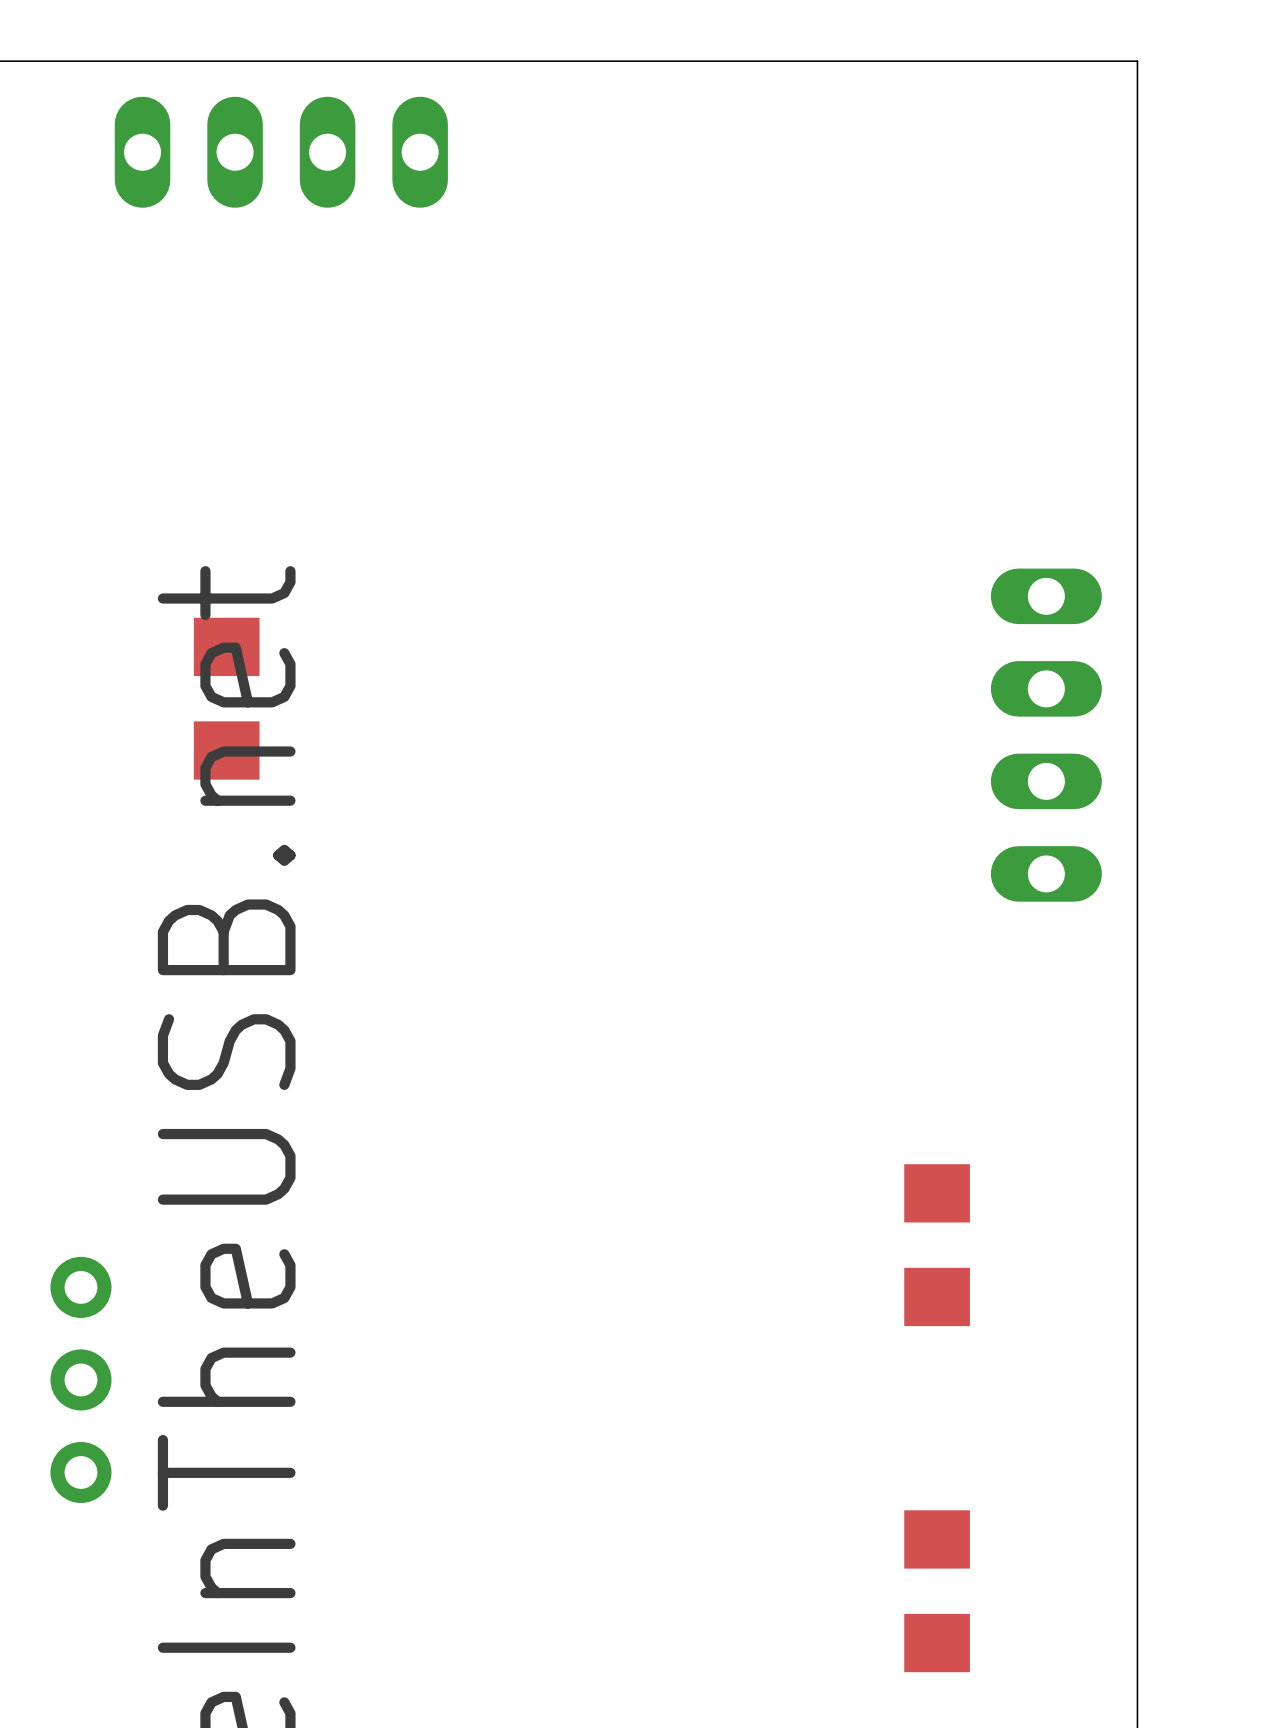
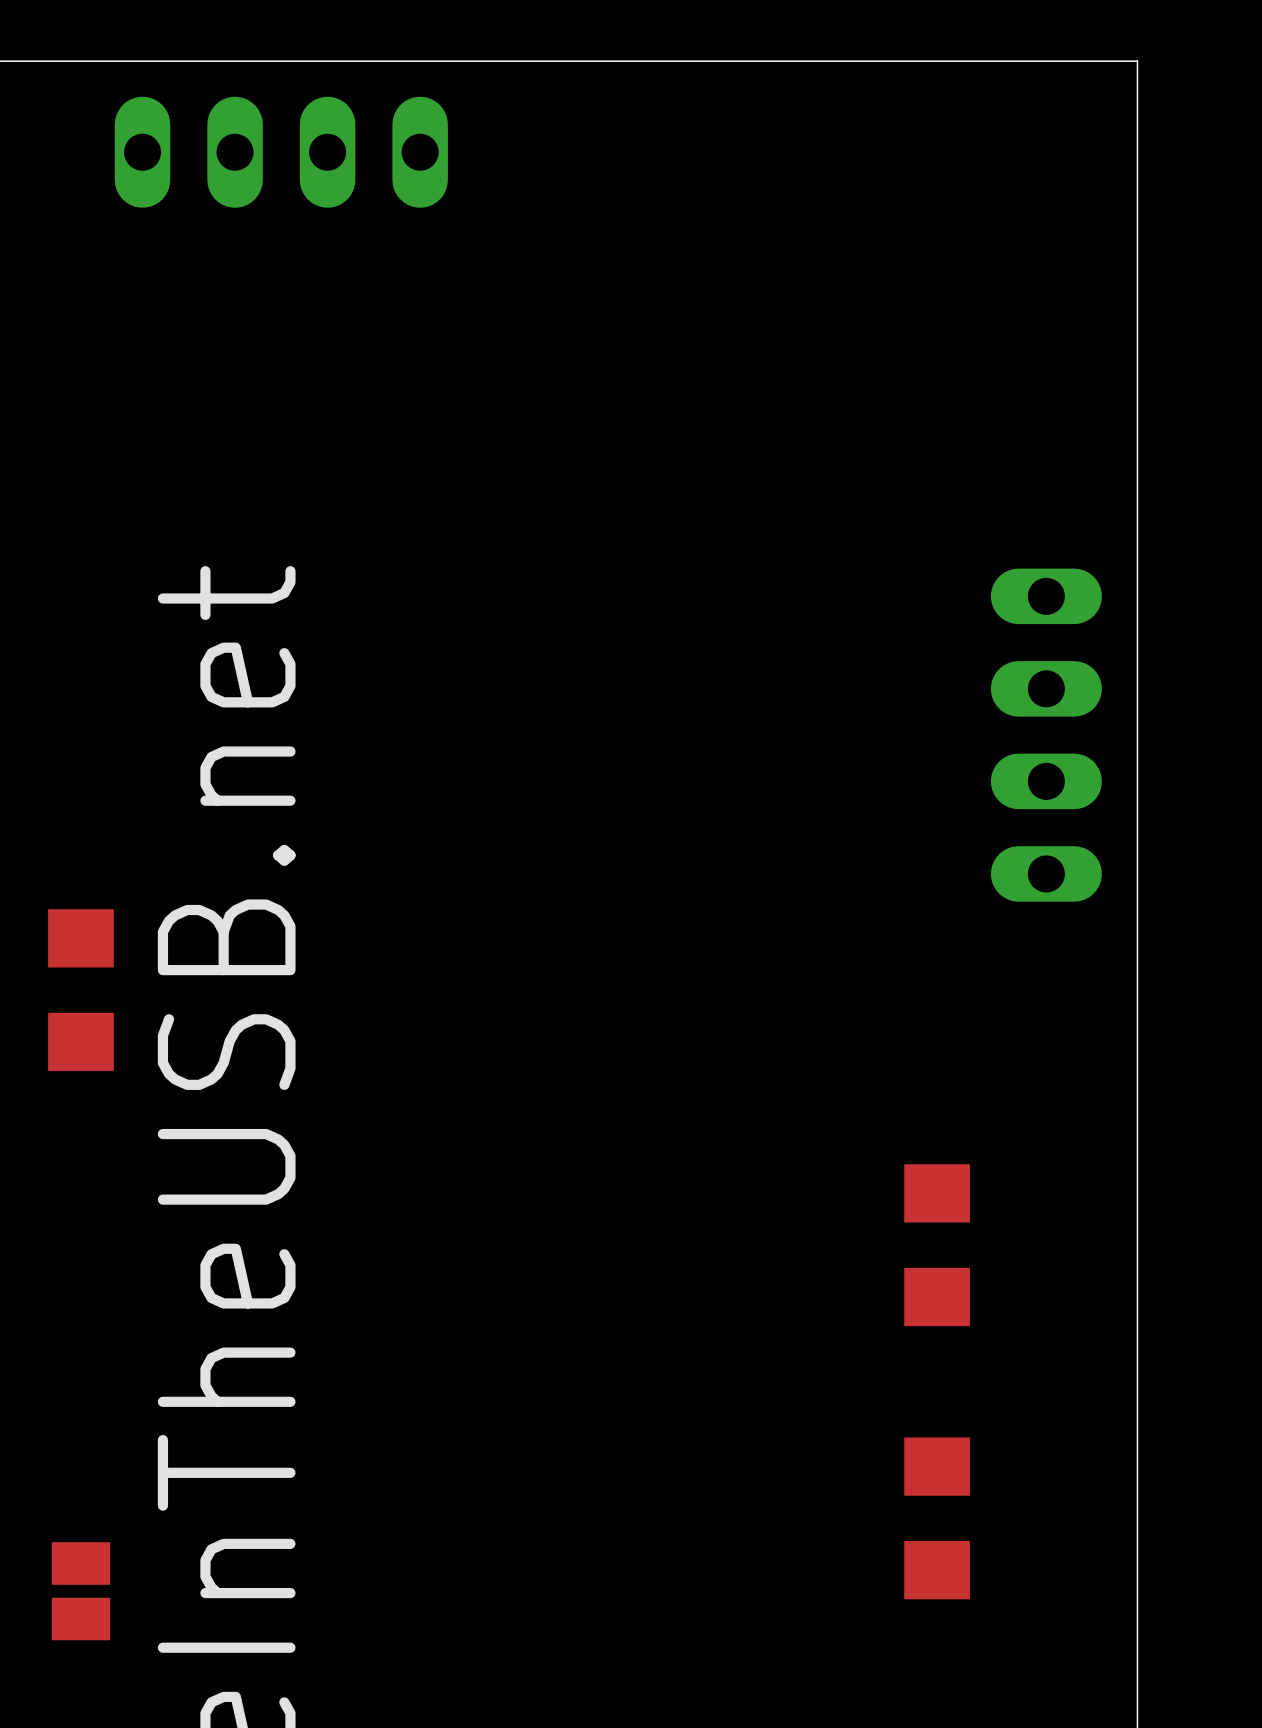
part position: (226, 698) -> (80, 990)
part: (80, 1379) -> none
part: none -> (80, 1591)
part position: (937, 1591) -> (937, 1518)

